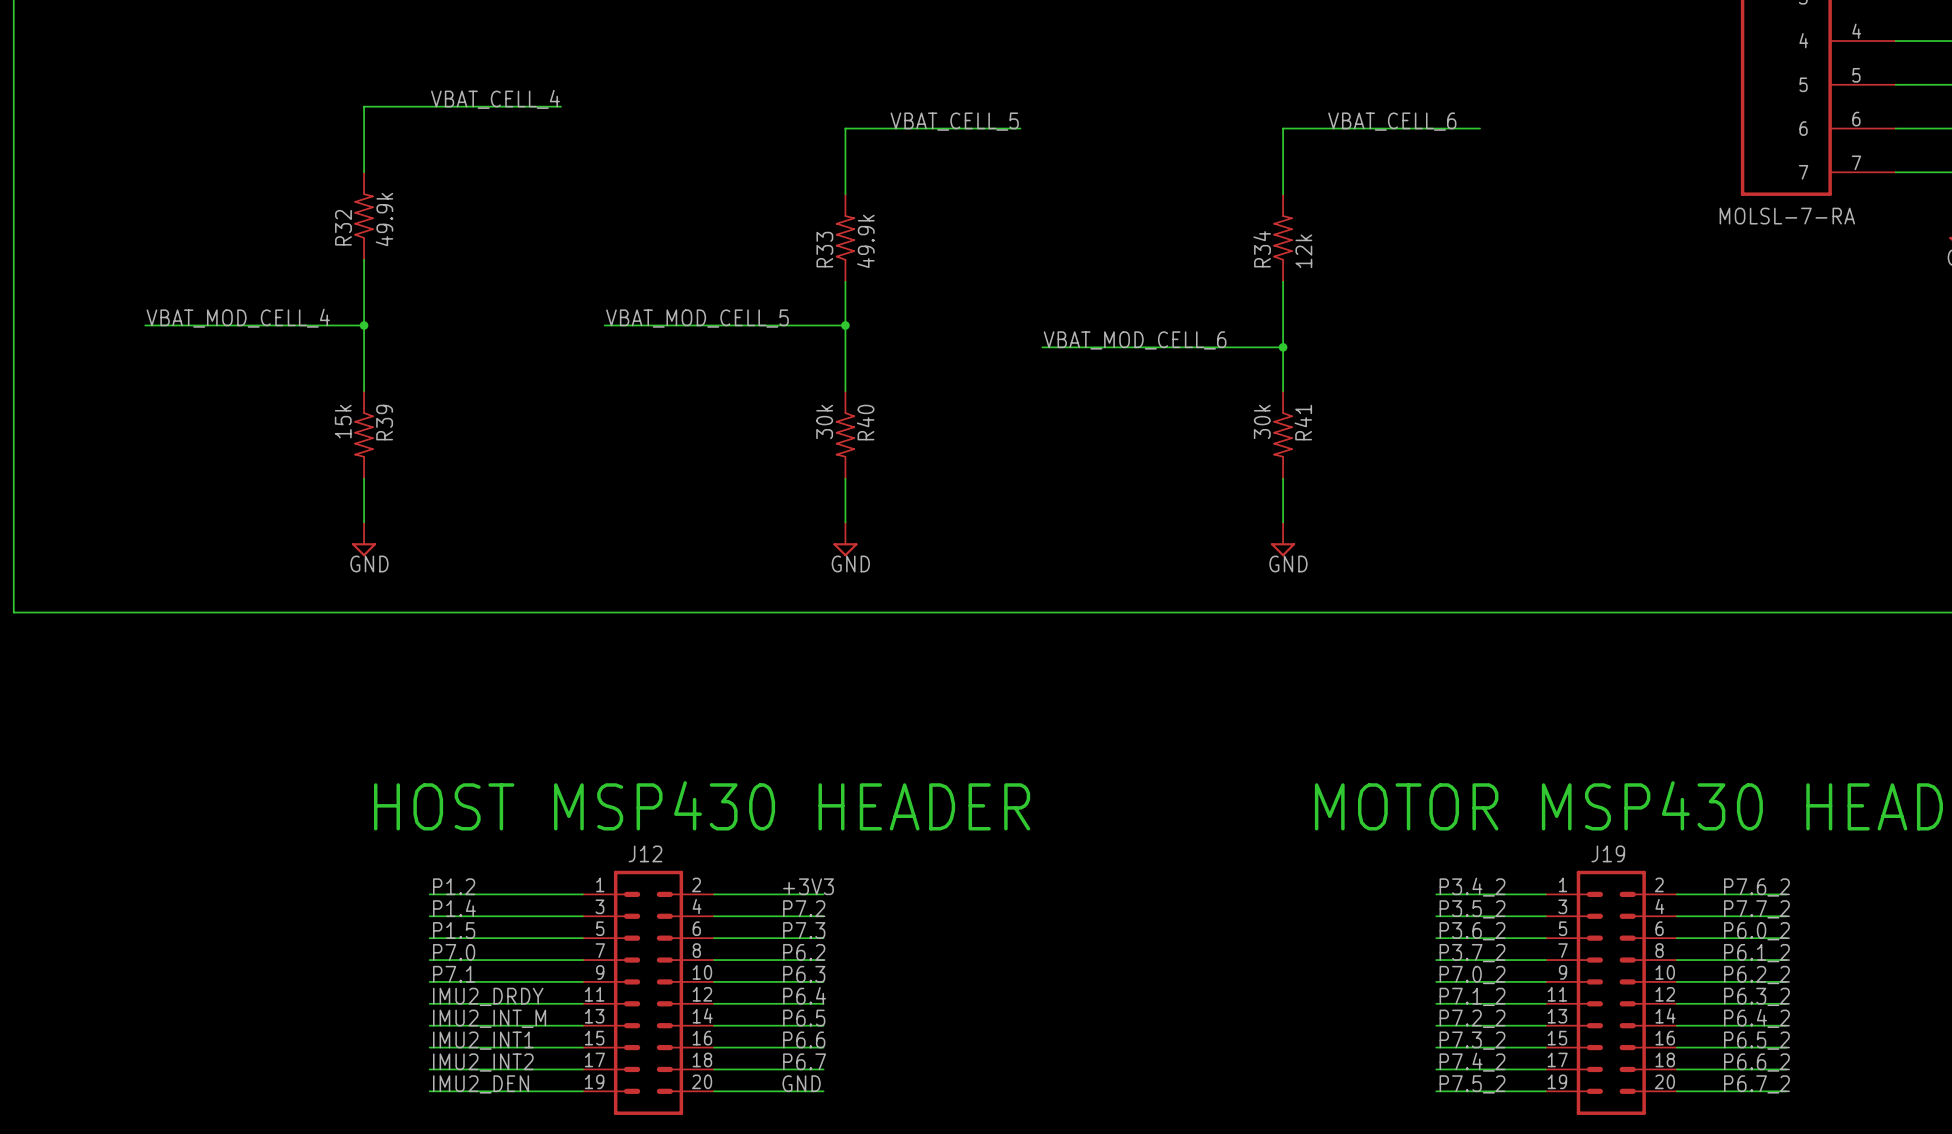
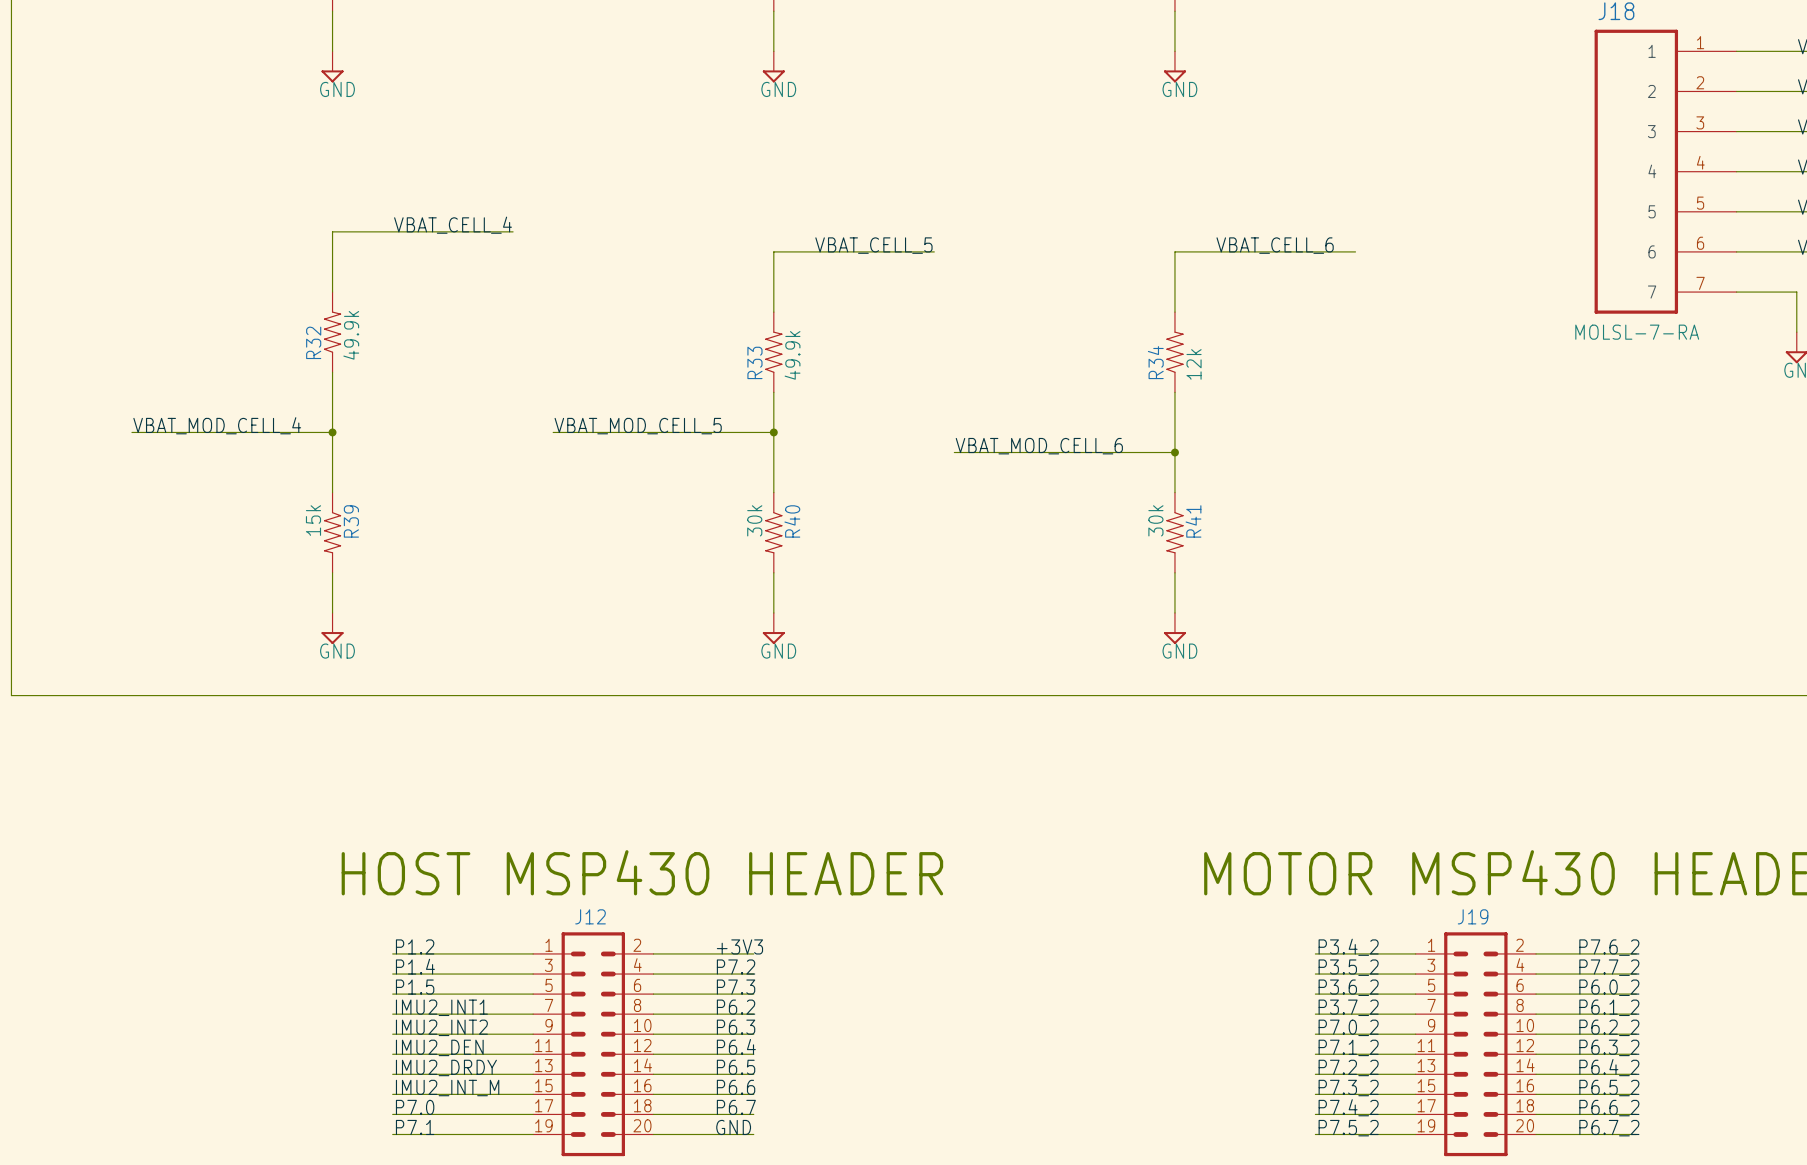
label: P7.0 (454, 952) -> IMU2_INT1 (441, 1007)
label: P7.1 (454, 974) -> IMU2_INT2 (441, 1027)
label: IMU2_DRDY (488, 996) -> IMU2_DEN (439, 1047)
label: IMU2_INT_M (489, 1018) -> IMU2_DRDY (446, 1067)
label: IMU2_INT1 (483, 1040) -> IMU2_INT_M (447, 1088)
label: IMU2_INT2 (483, 1062) -> P7.0 (415, 1107)
label: IMU2_DEN (481, 1084) -> P7.1 (415, 1127)

